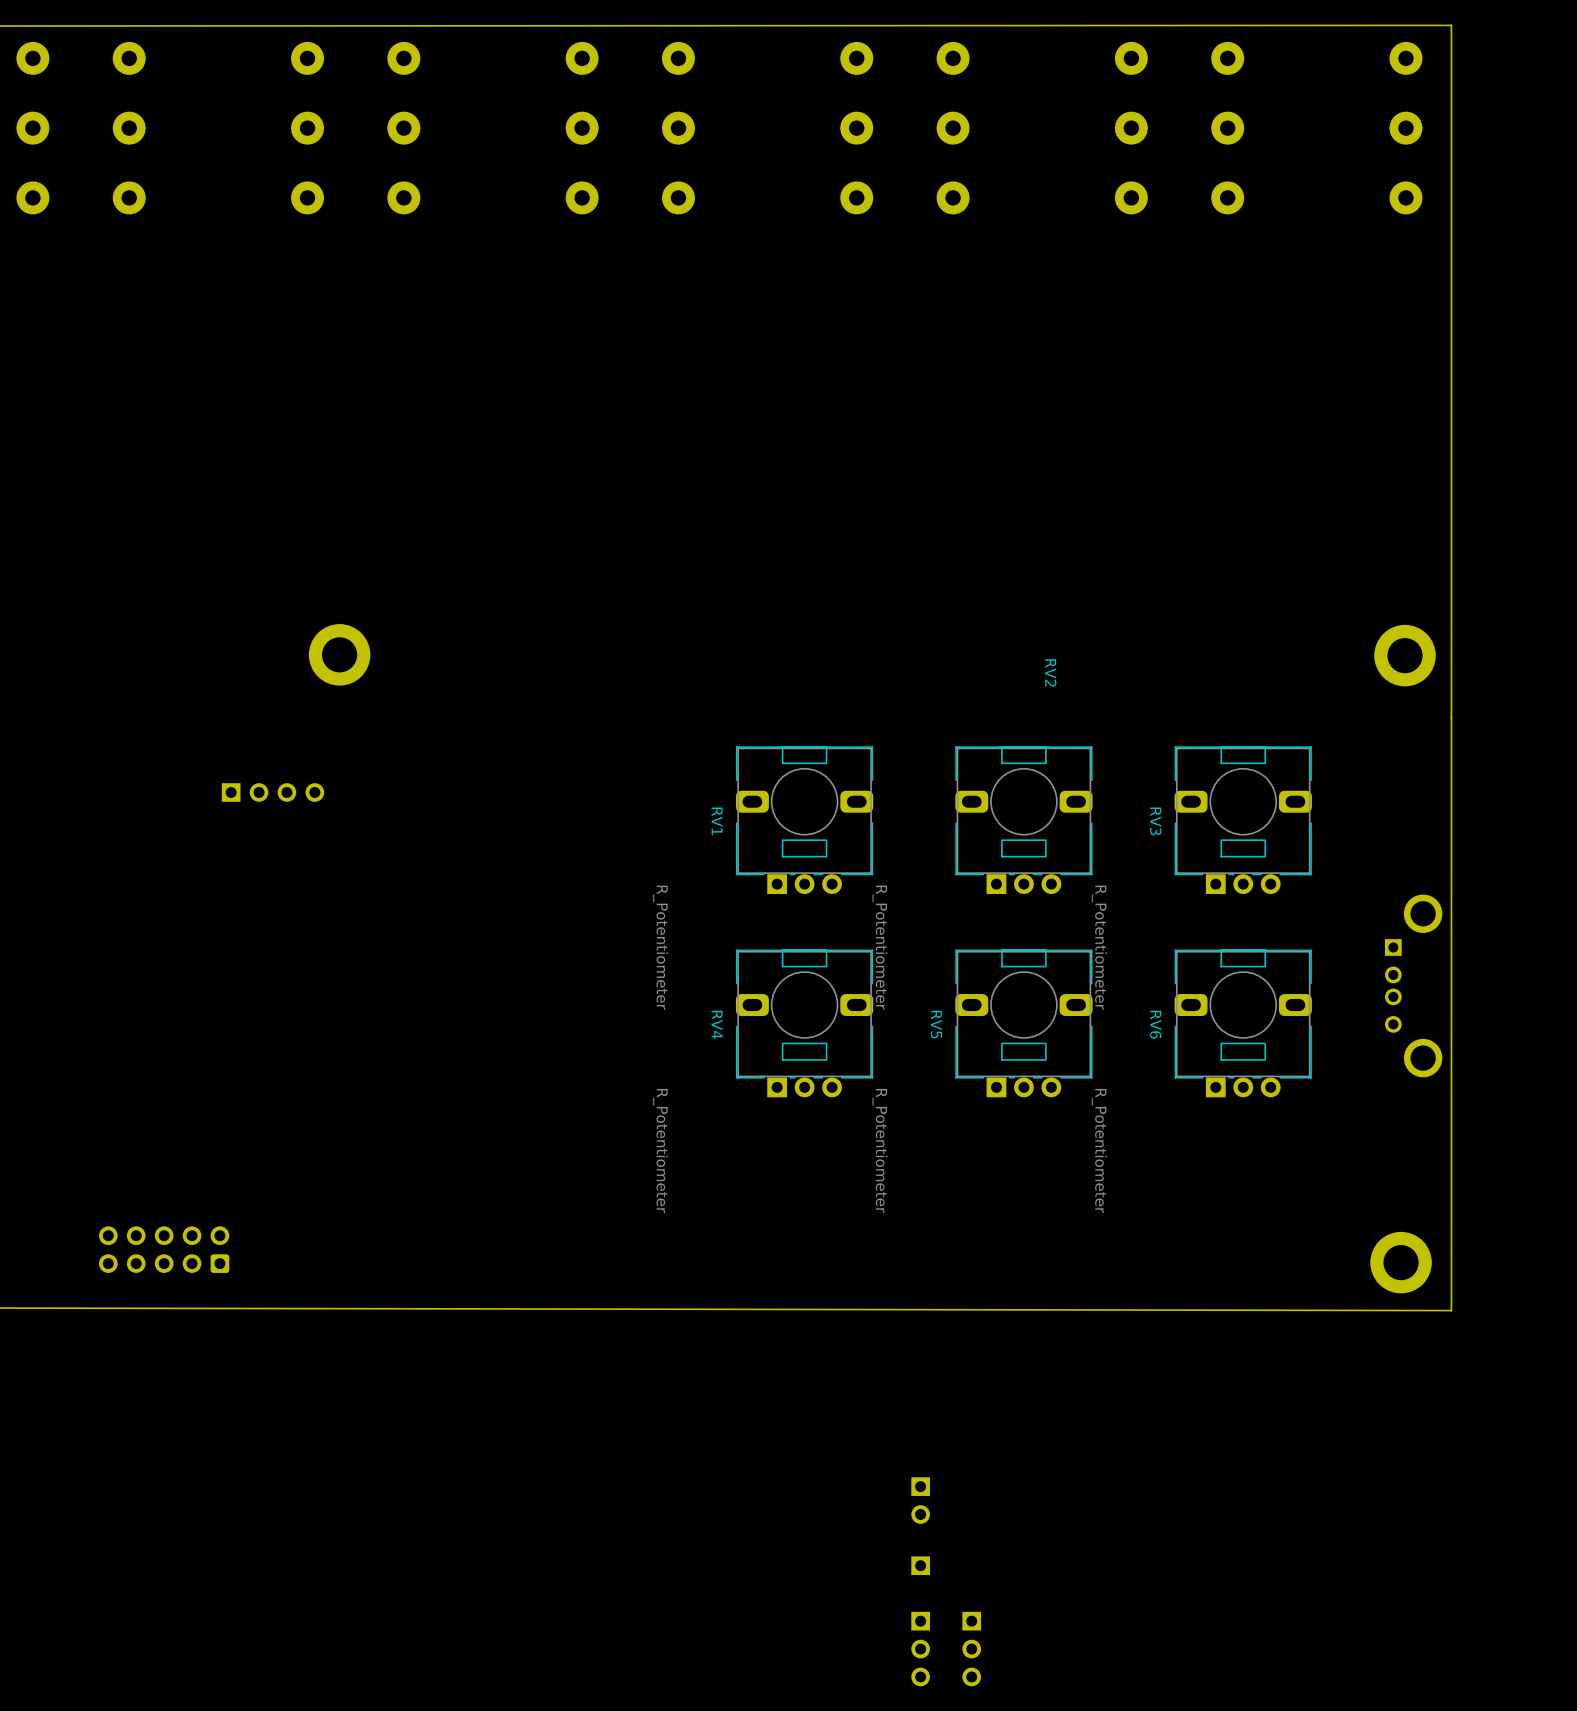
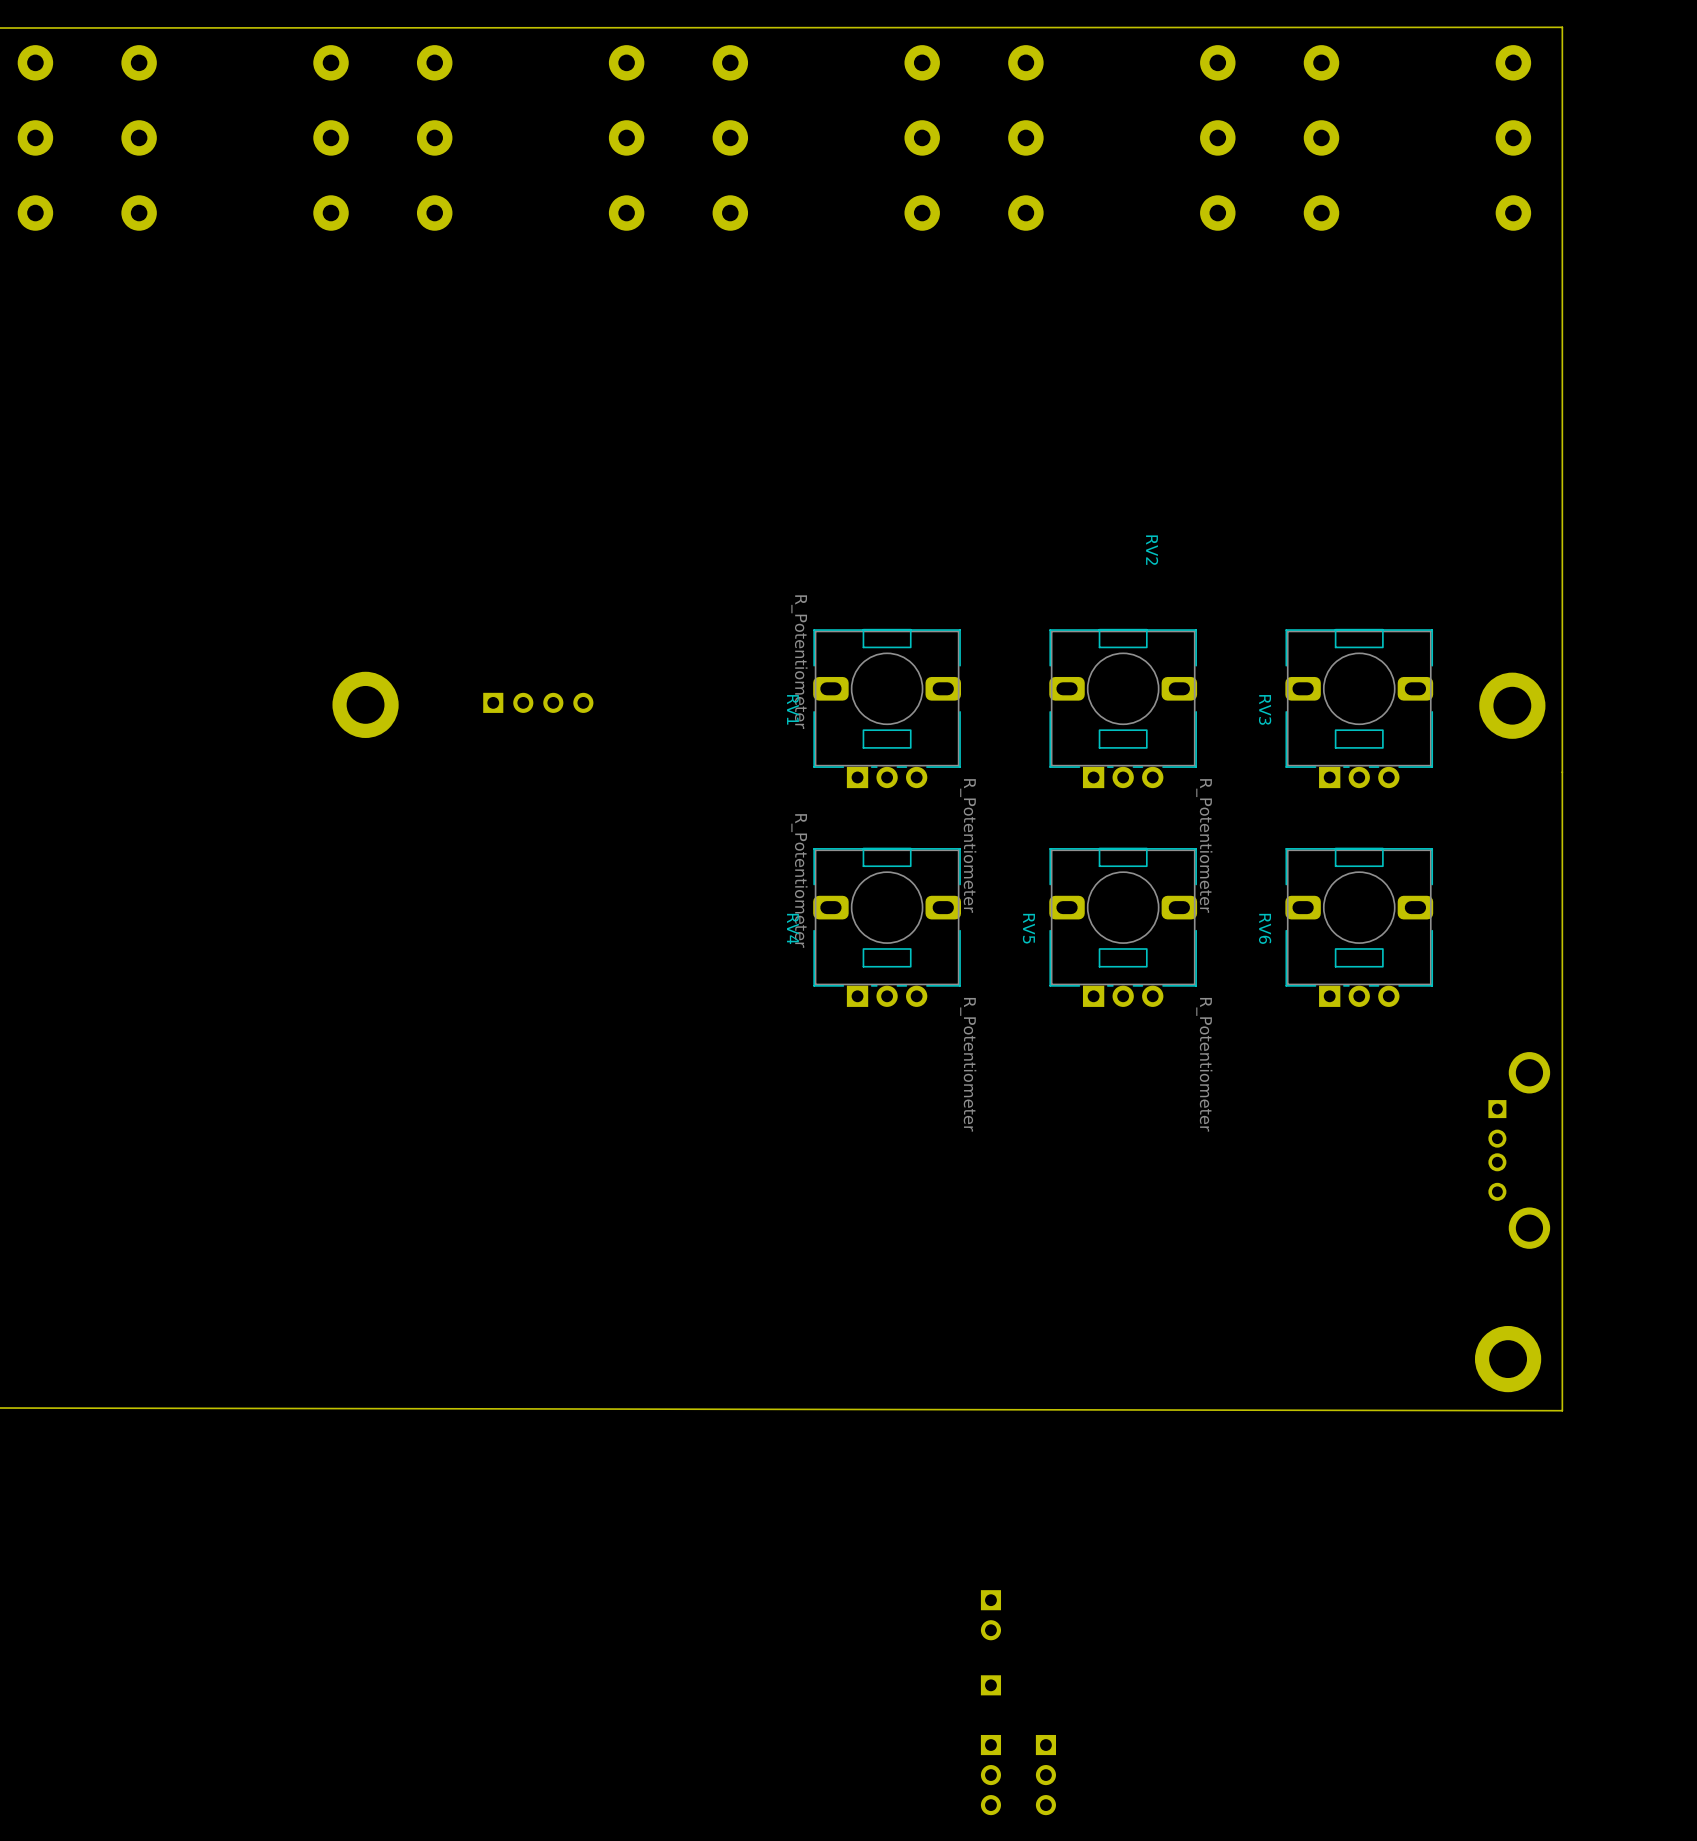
part position: (272, 792) -> (538, 702)
RV1 position: (804, 820) -> (887, 708)
RV2 position: (1023, 820) -> (1123, 708)
RV3 position: (1243, 820) -> (1359, 708)
RV1 value position: R_Potentiometer (660, 947) -> R_Potentiometer (799, 662)
part position: (1413, 985) -> (1519, 1150)
RV4 position: (804, 1023) -> (887, 927)
RV5 position: (1023, 1023) -> (1123, 927)
RV6 position: (1243, 1023) -> (1359, 927)
RV4 value position: R_Potentiometer (660, 1151) -> R_Potentiometer (799, 880)
part: (164, 1249) -> none

